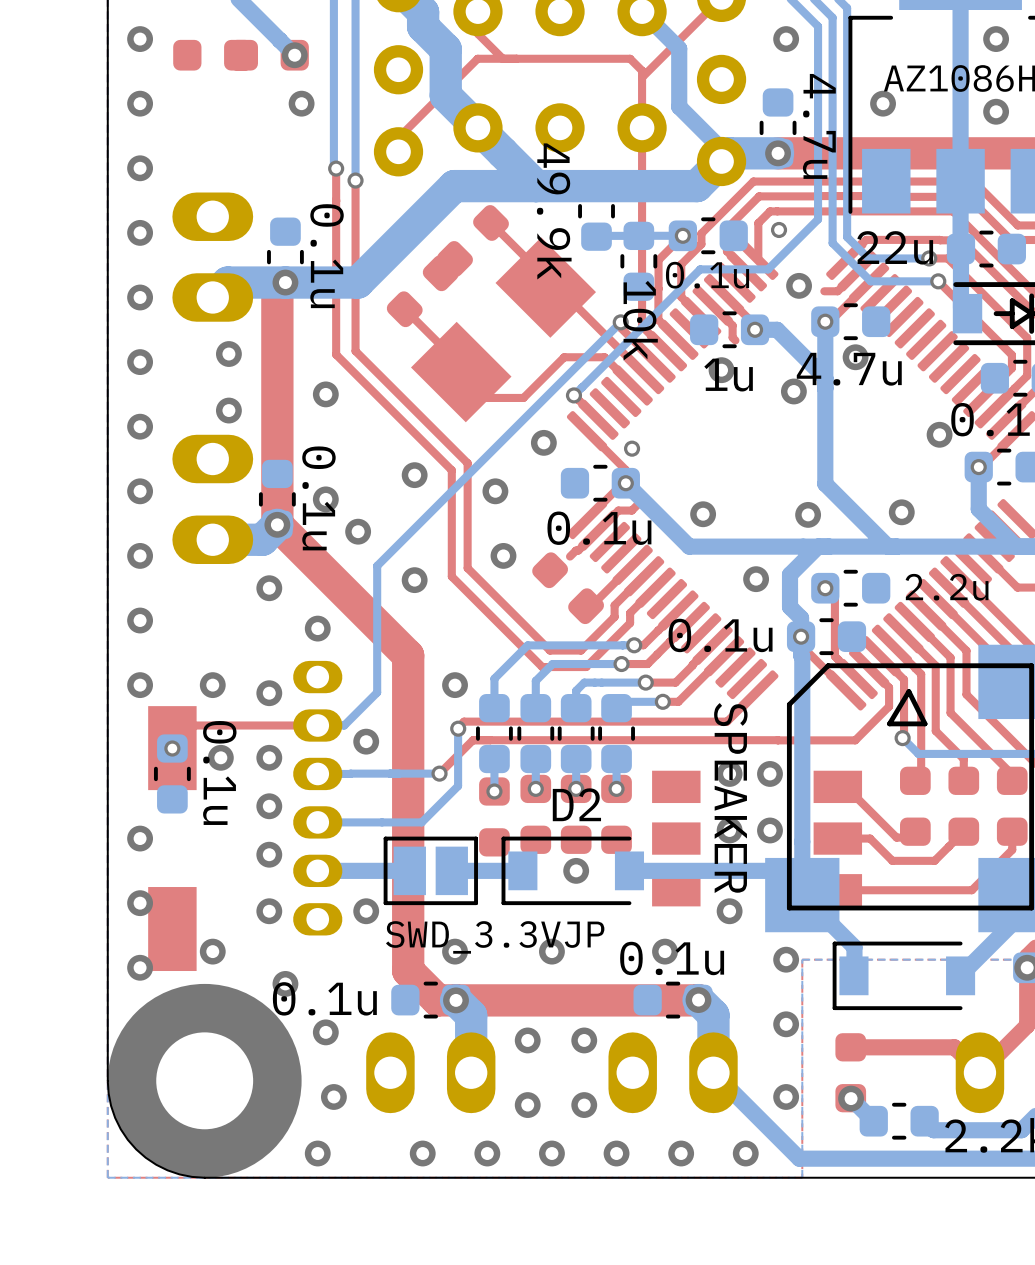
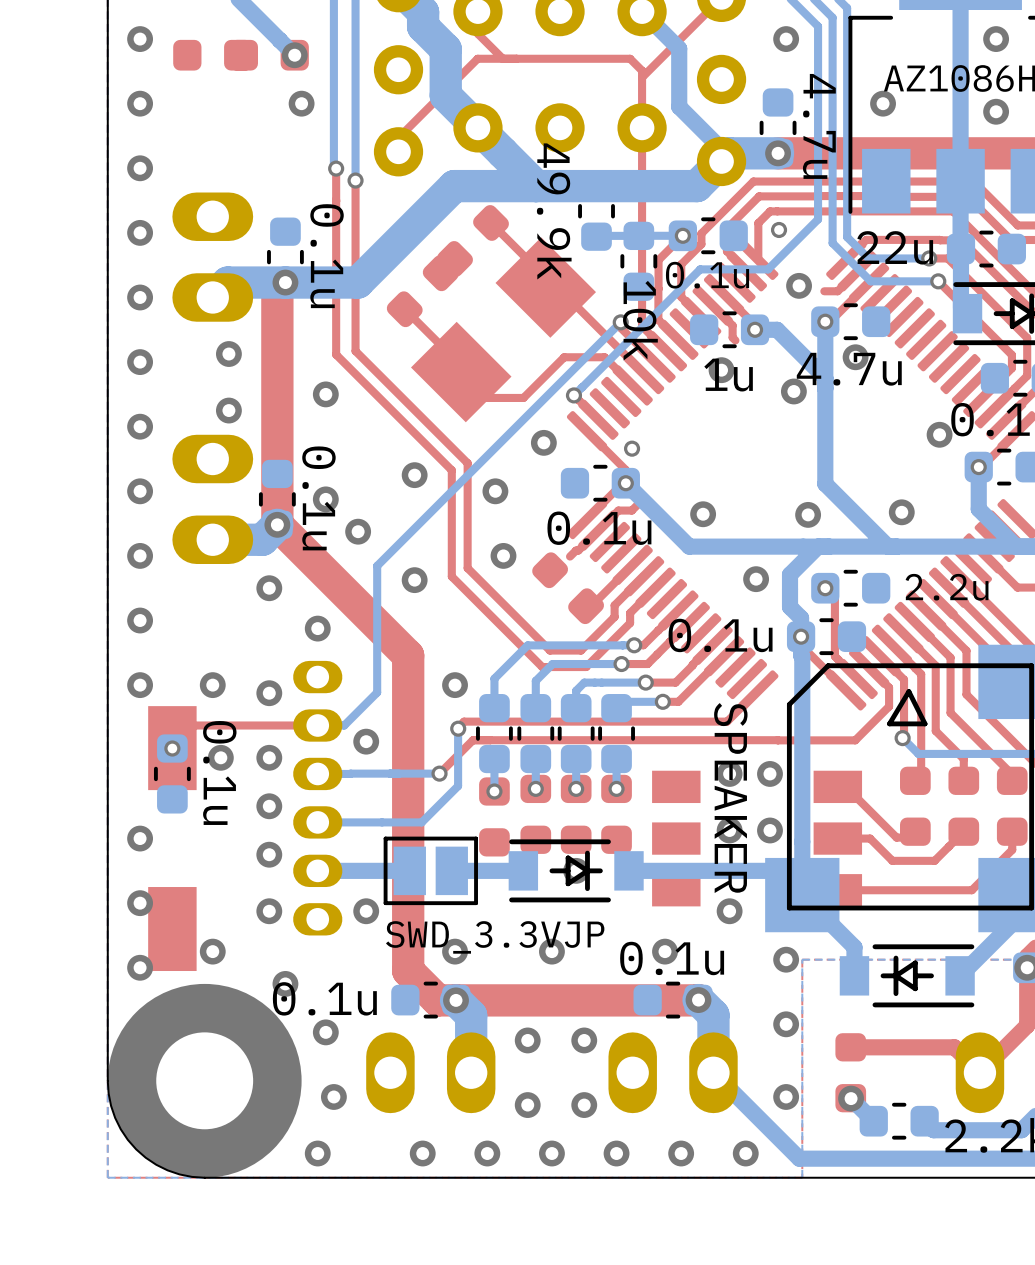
D2: (572, 870) -> none
part: none -> (576, 870)
part footprint: [832, 941, 976, 1011] -> [839, 944, 975, 1008]

